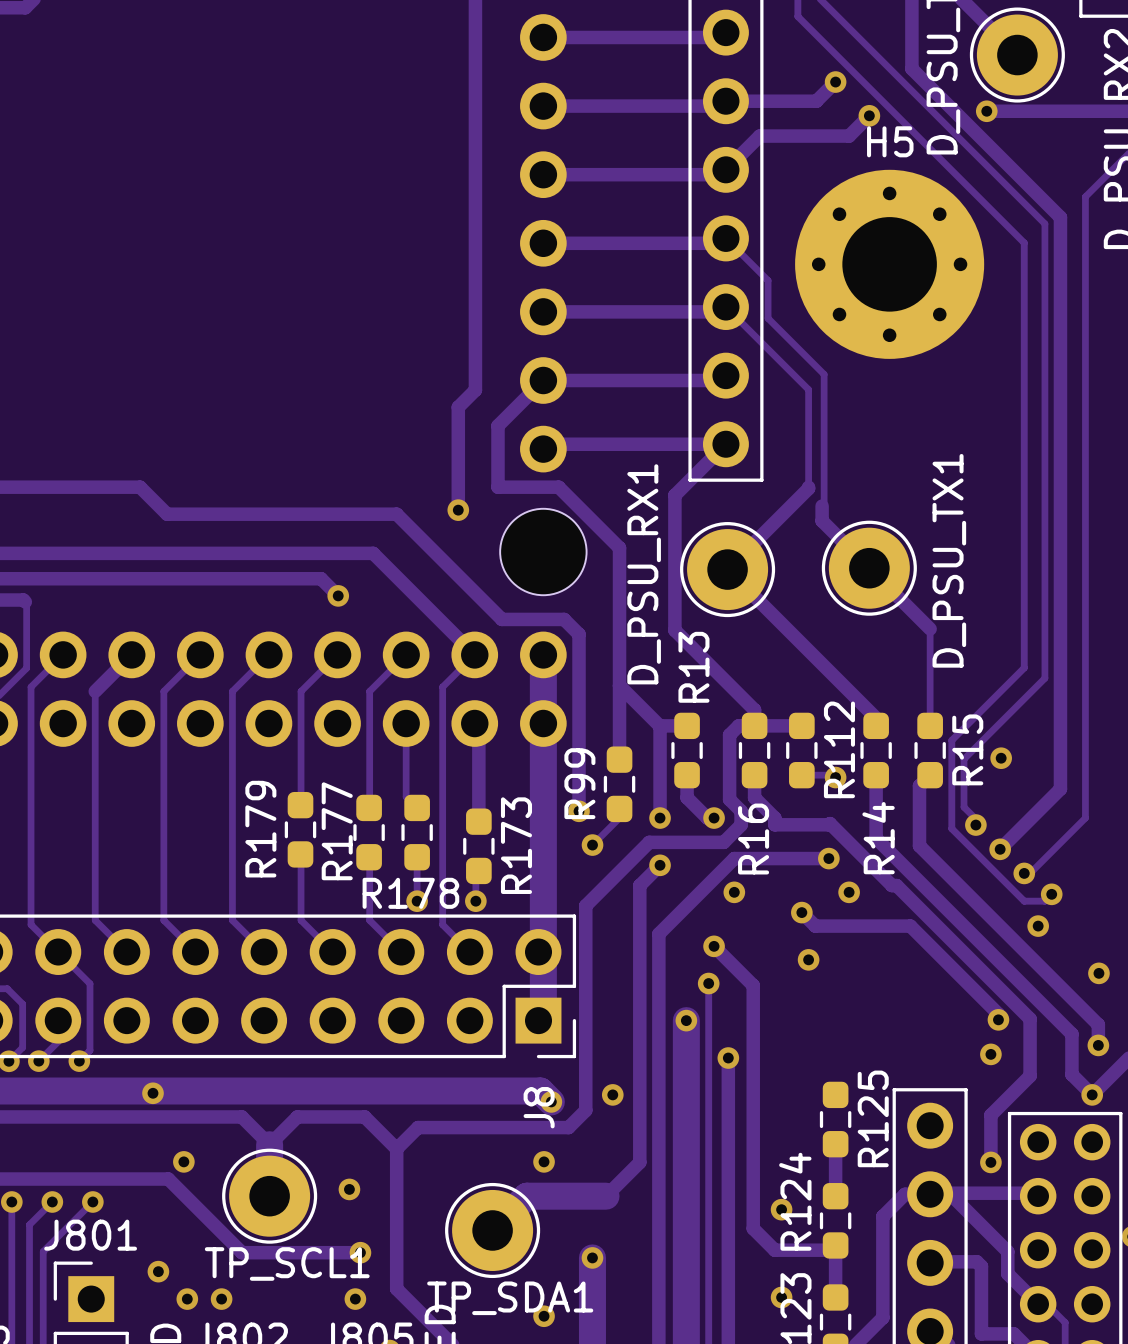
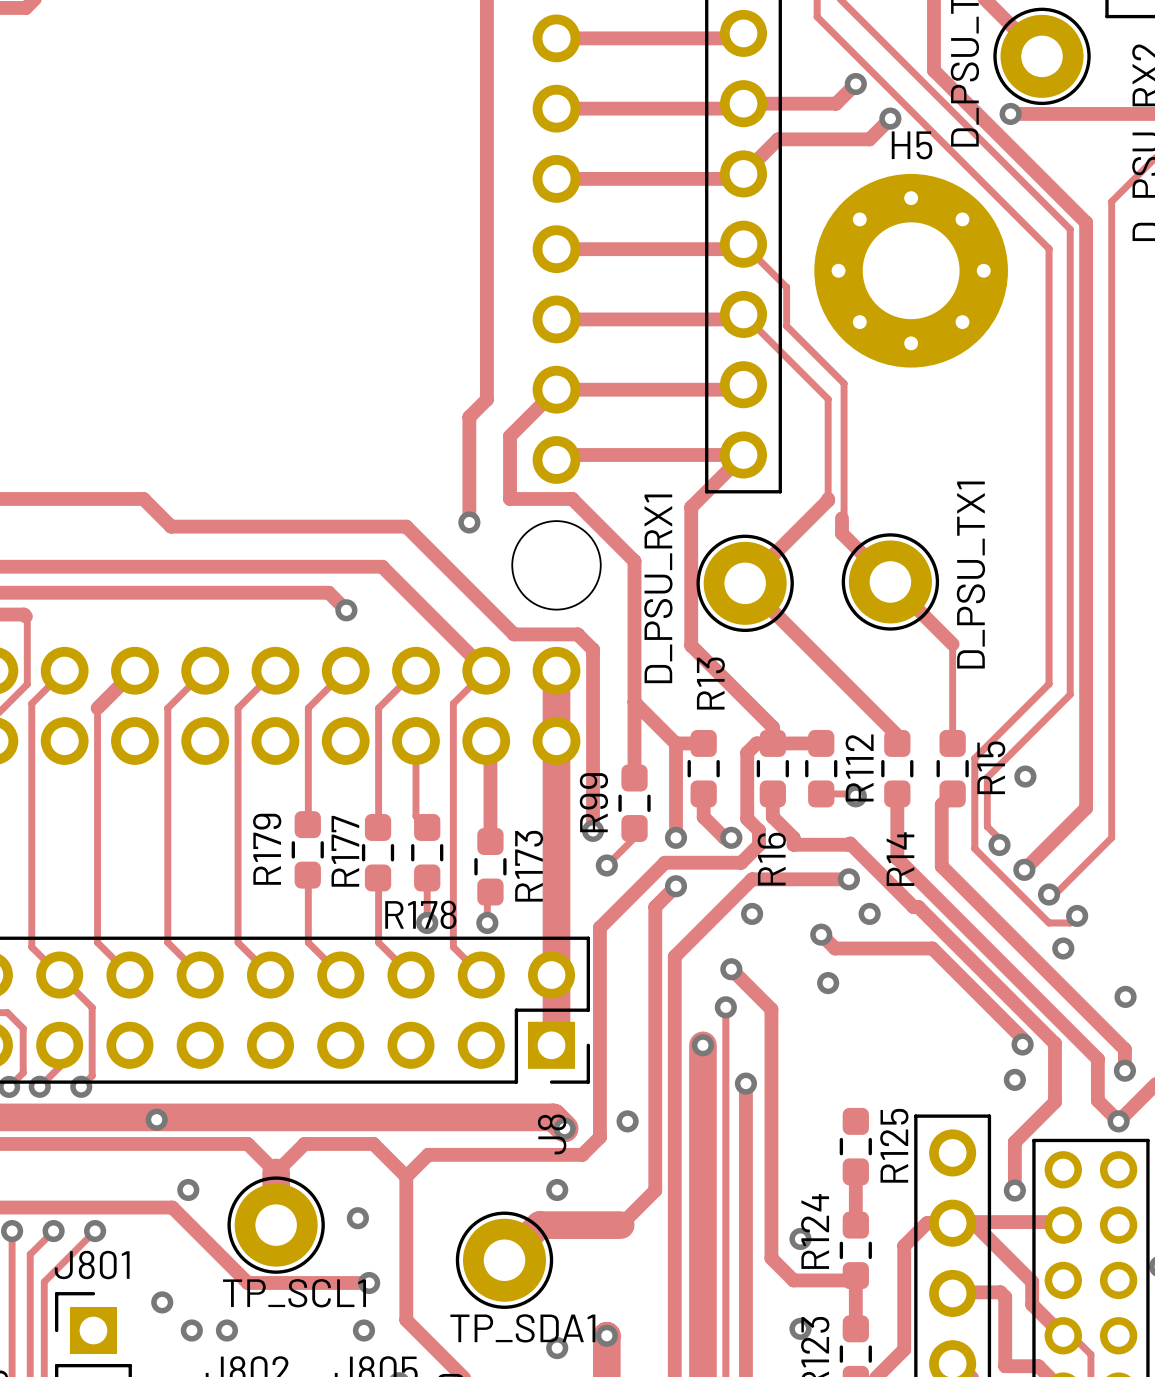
track: (592, 1257) (592, 1304) -> none
via position: (592, 1257) -> (606, 1335)

